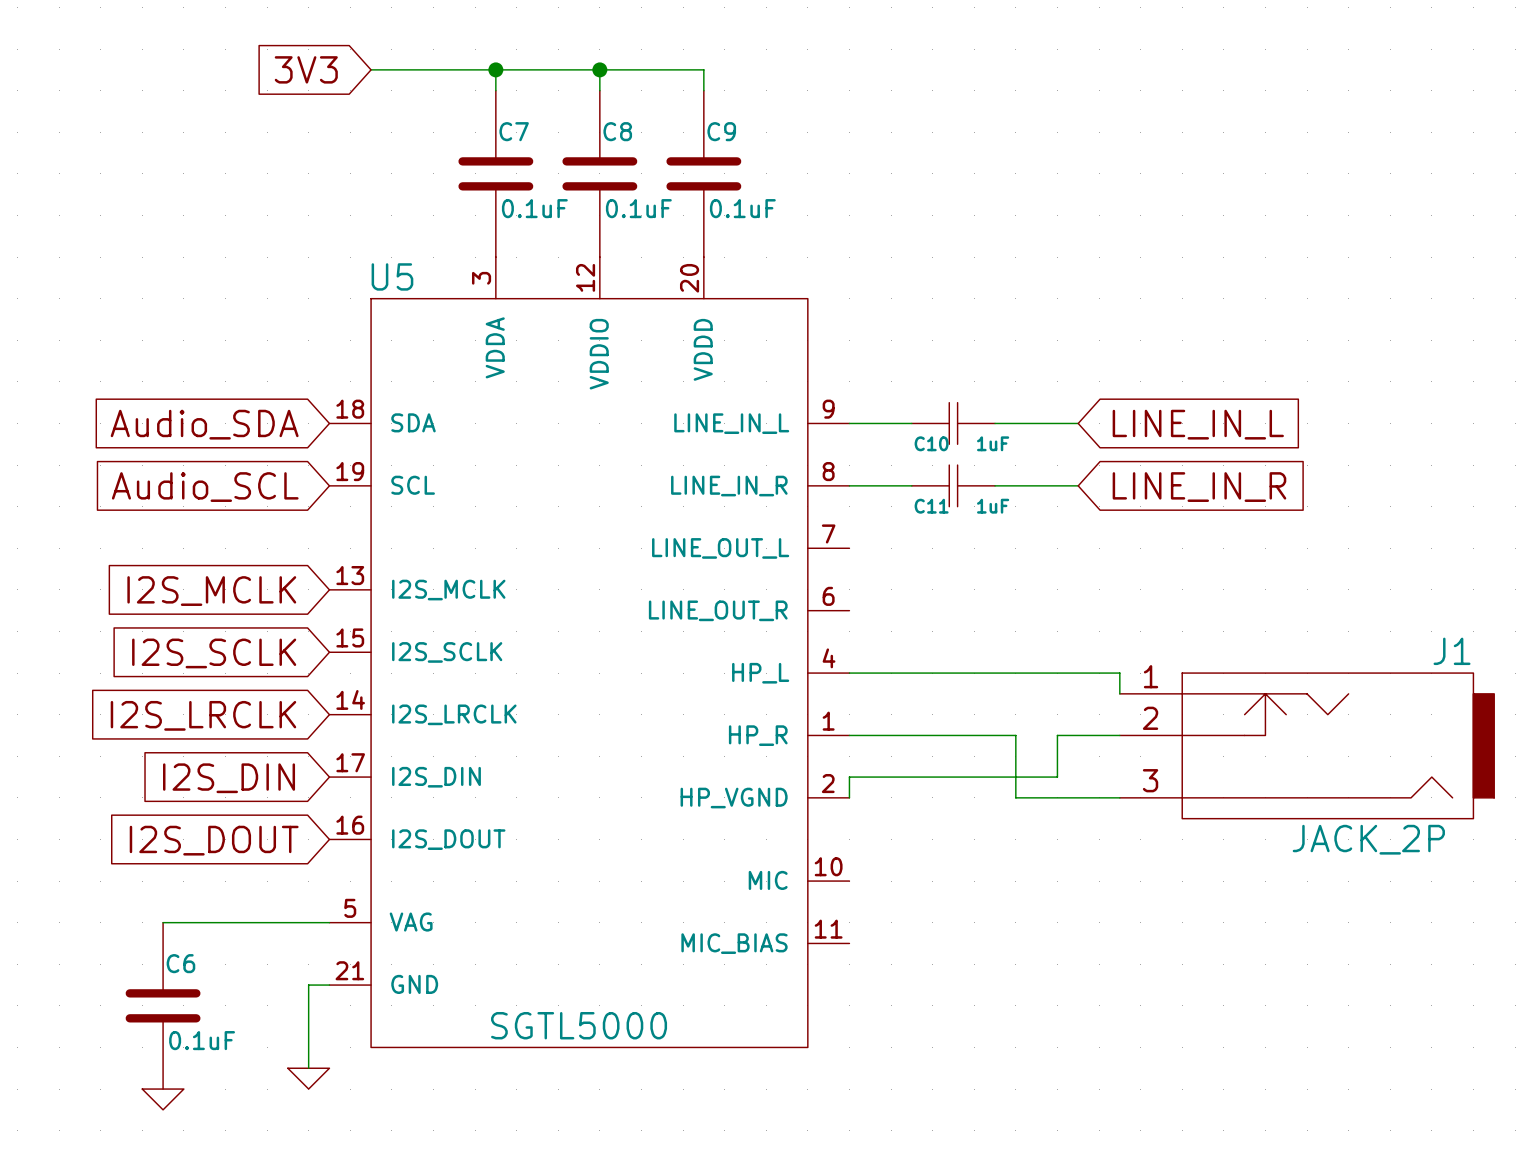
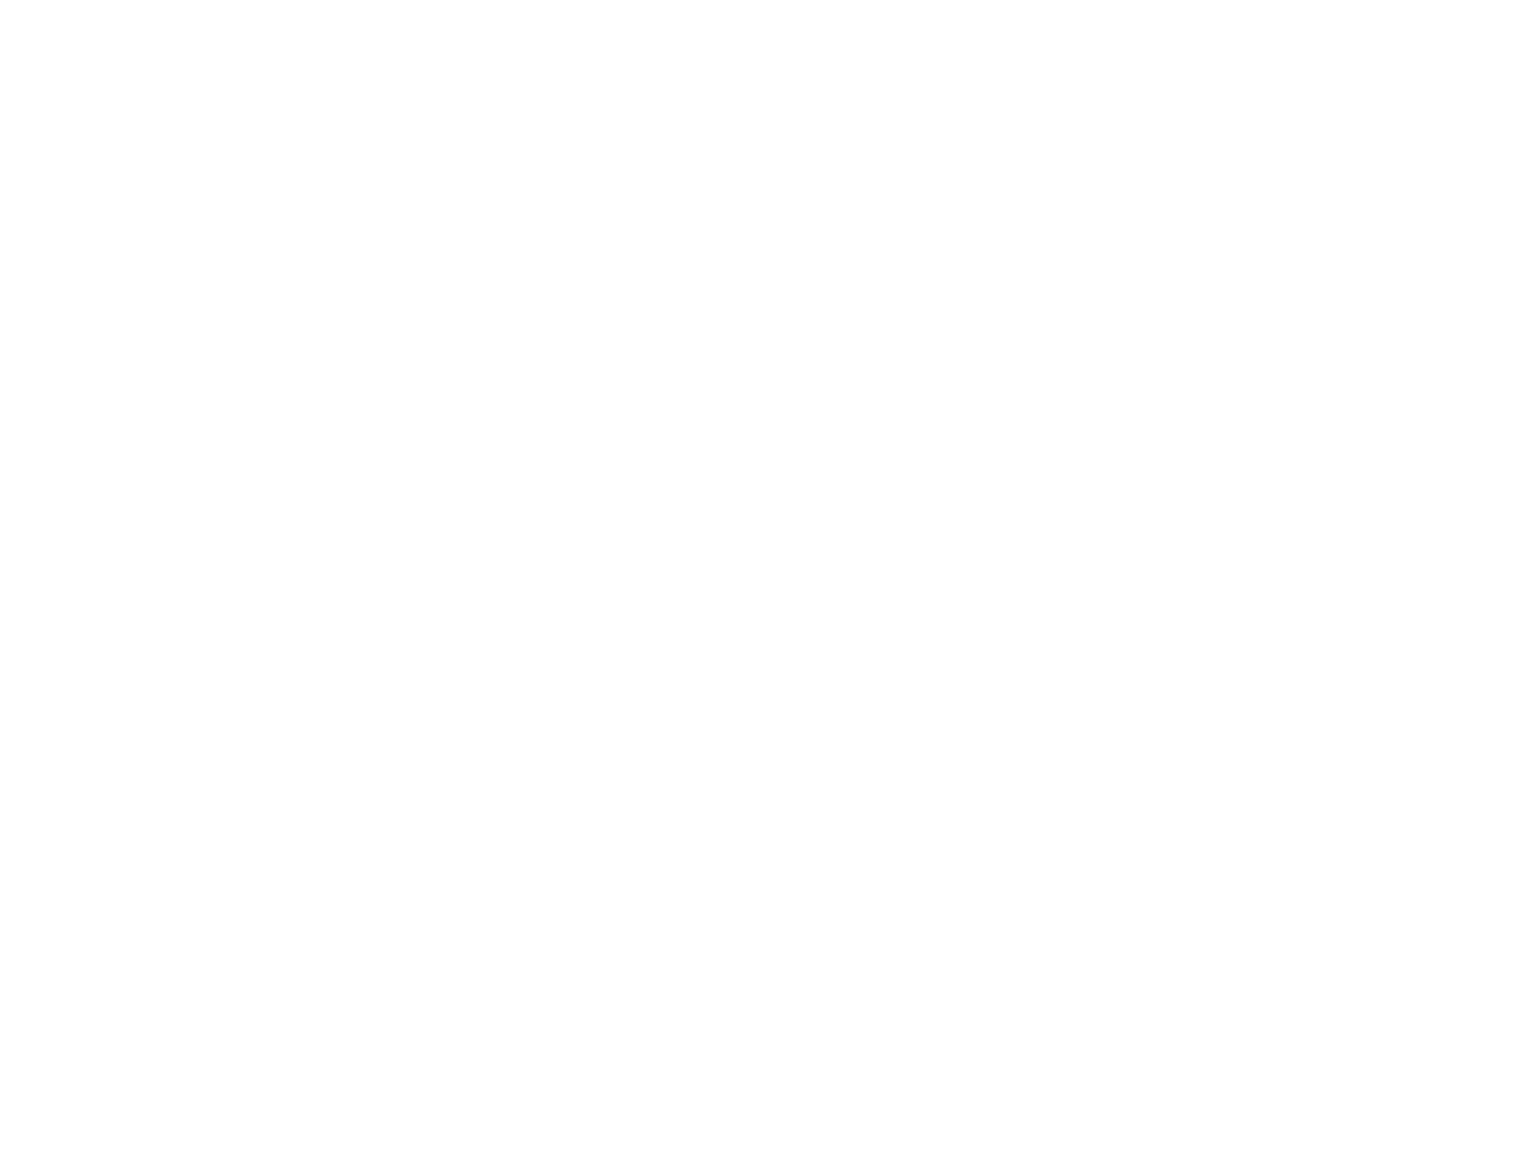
global label: 3V3 (306, 69) -> none
wire: (371, 69) (703, 69) (703, 90) -> none
wire: (495, 69) (495, 90) -> none
junction: (495, 69) -> none
wire: (599, 69) (599, 90) -> none
junction: (599, 69) -> none
C7: 0.1uF (495, 173) -> none
C8: 0.1uF (599, 173) -> none
C9: 0.1uF (703, 173) -> none
wire: (849, 423) (911, 423) -> none
C10: 1uF (953, 423) -> none
wire: (995, 423) (1078, 423) -> none
global label: Audio_SDA (204, 424) -> none
global label: LINE_IN_L (1198, 424) -> none
wire: (849, 485) (911, 485) -> none
C11: 1uF (953, 485) -> none
wire: (995, 485) (1078, 485) -> none
global label: Audio_SCL (205, 487) -> none
global label: LINE_IN_R (1199, 487) -> none
global label: I2S_MCLK (211, 591) -> none
U5: SGTL5000 (589, 652) -> none
global label: I2S_SCLK (214, 653) -> none
wire: (849, 673) (1119, 673) (1119, 693) -> none
global label: I2S_LRCLK (203, 715) -> none
wire: (849, 735) (1015, 735) (1015, 797) (1119, 797) -> none
wire: (1119, 735) (1057, 735) (1057, 777) (849, 777) (849, 797) -> none
J1: JACK_2P (1307, 745) -> none
global label: I2S_DIN (229, 778) -> none
global label: I2S_DOUT (214, 840) -> none
wire: (163, 922) (329, 922) -> none
wire: (329, 985) (308, 985) (308, 1068) -> none
C6: 0.1uF (163, 1005) -> none
power symbol: (308, 1078) -> none
power symbol: (163, 1099) -> none

